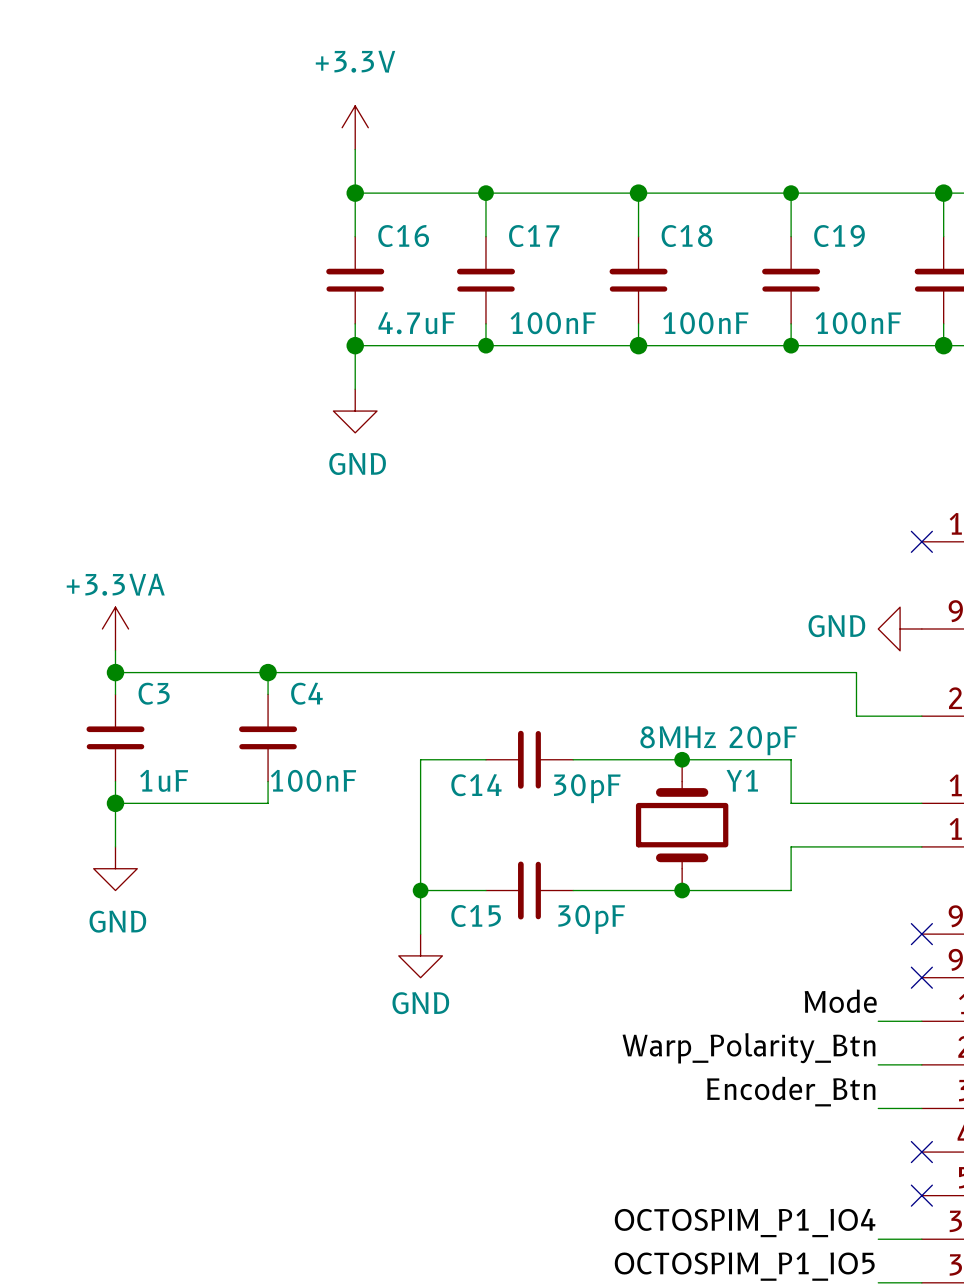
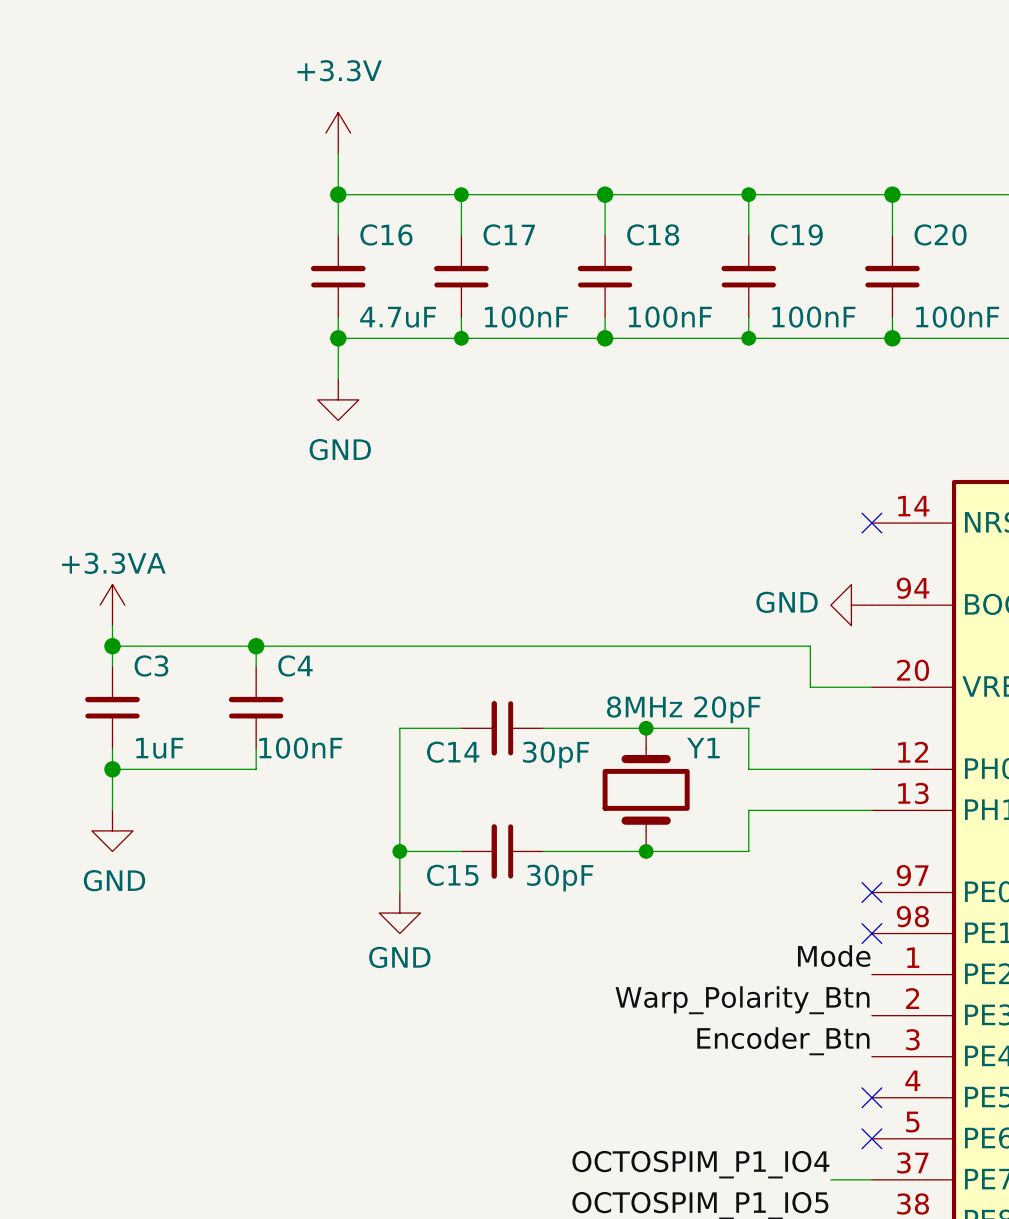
label position: Mode (840, 1001) -> Mode (834, 956)
wire: (878, 1021) (921, 1021) -> none
label position: Warp_Polarity_Btn (749, 1048) -> Warp_Polarity_Btn (742, 1000)
wire: (878, 1064) (921, 1064) -> none
label position: Encoder_Btn (791, 1091) -> Encoder_Btn (783, 1041)
wire: (878, 1108) (921, 1108) -> none

